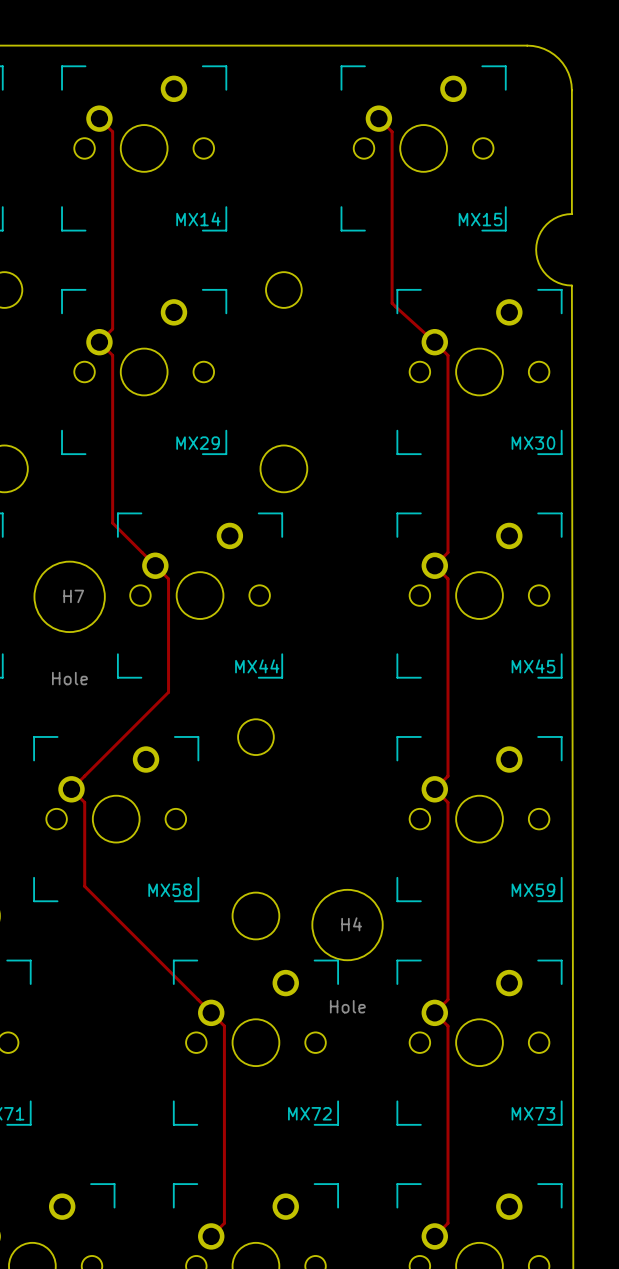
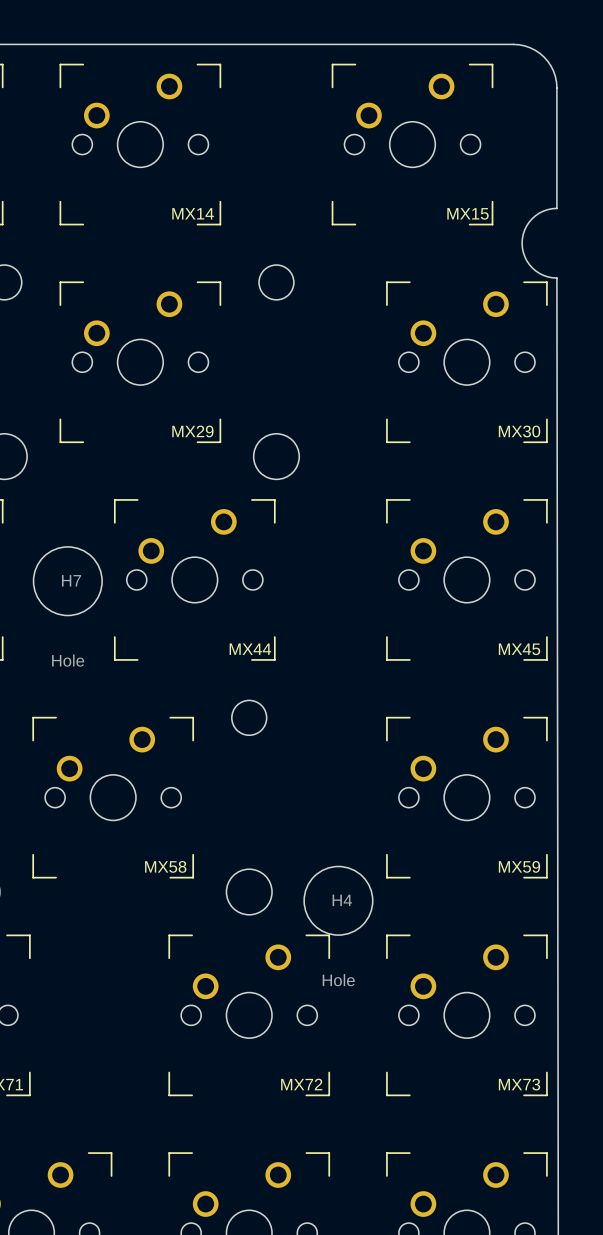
track: (99, 118) (112, 131) (112, 328) (99, 342) (112, 355) (112, 523) (168, 578) (168, 692) (71, 789) (84, 802) (84, 886) (224, 1026) (224, 1223) (211, 1236) -> none
track: (378, 118) (392, 131) (392, 303) (448, 355) (448, 552) (434, 565) (448, 578) (448, 776) (434, 789) (448, 802) (448, 999) (434, 1012) (448, 1026) (448, 1223) (434, 1236) -> none

